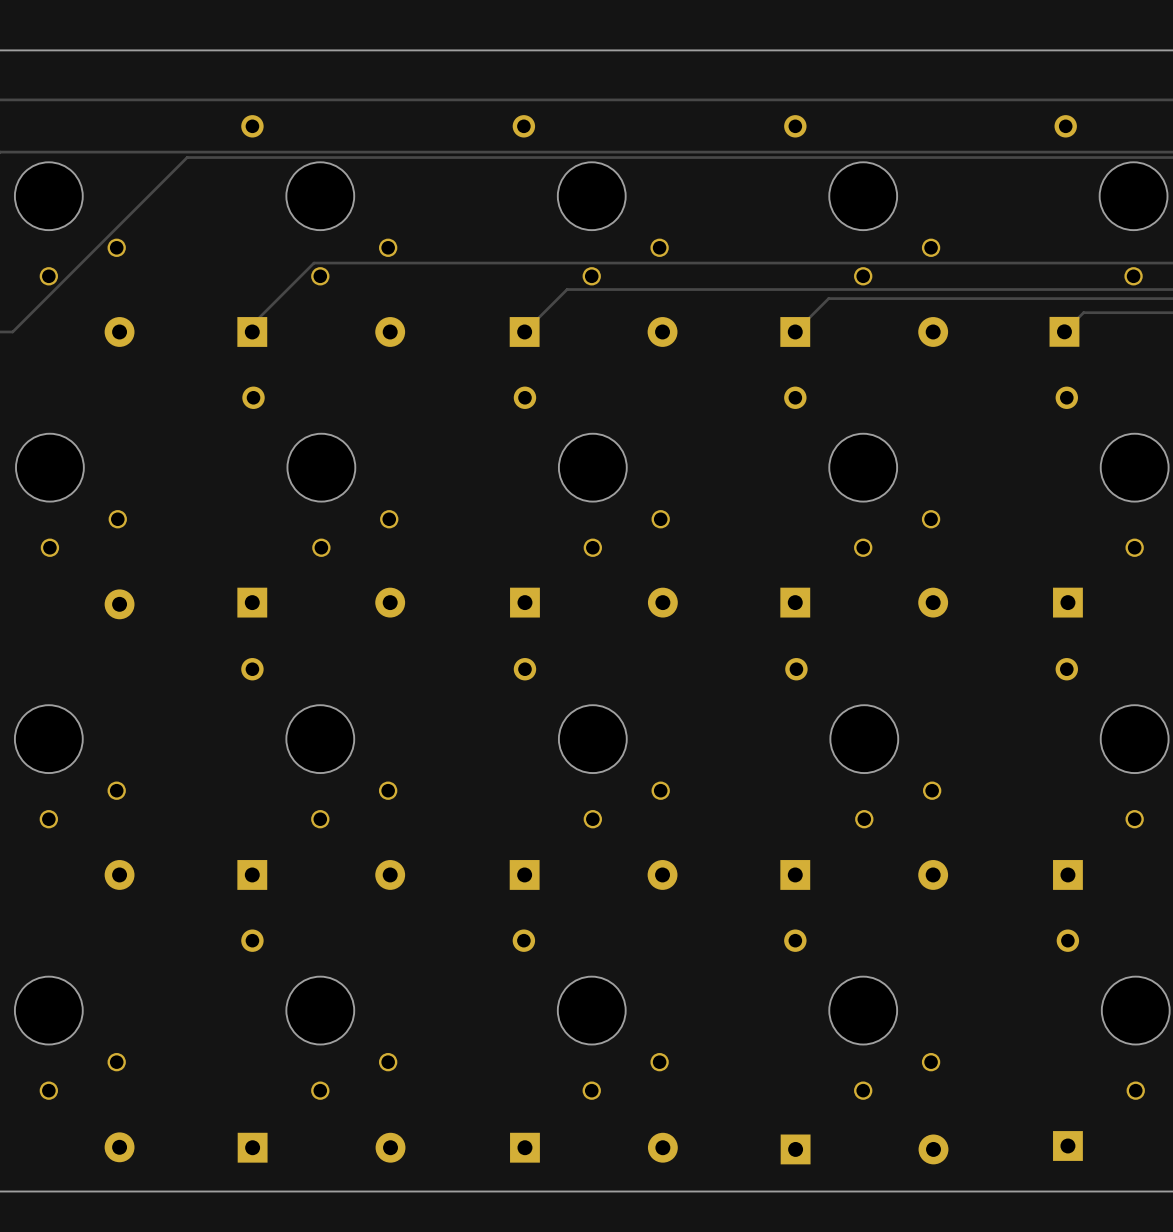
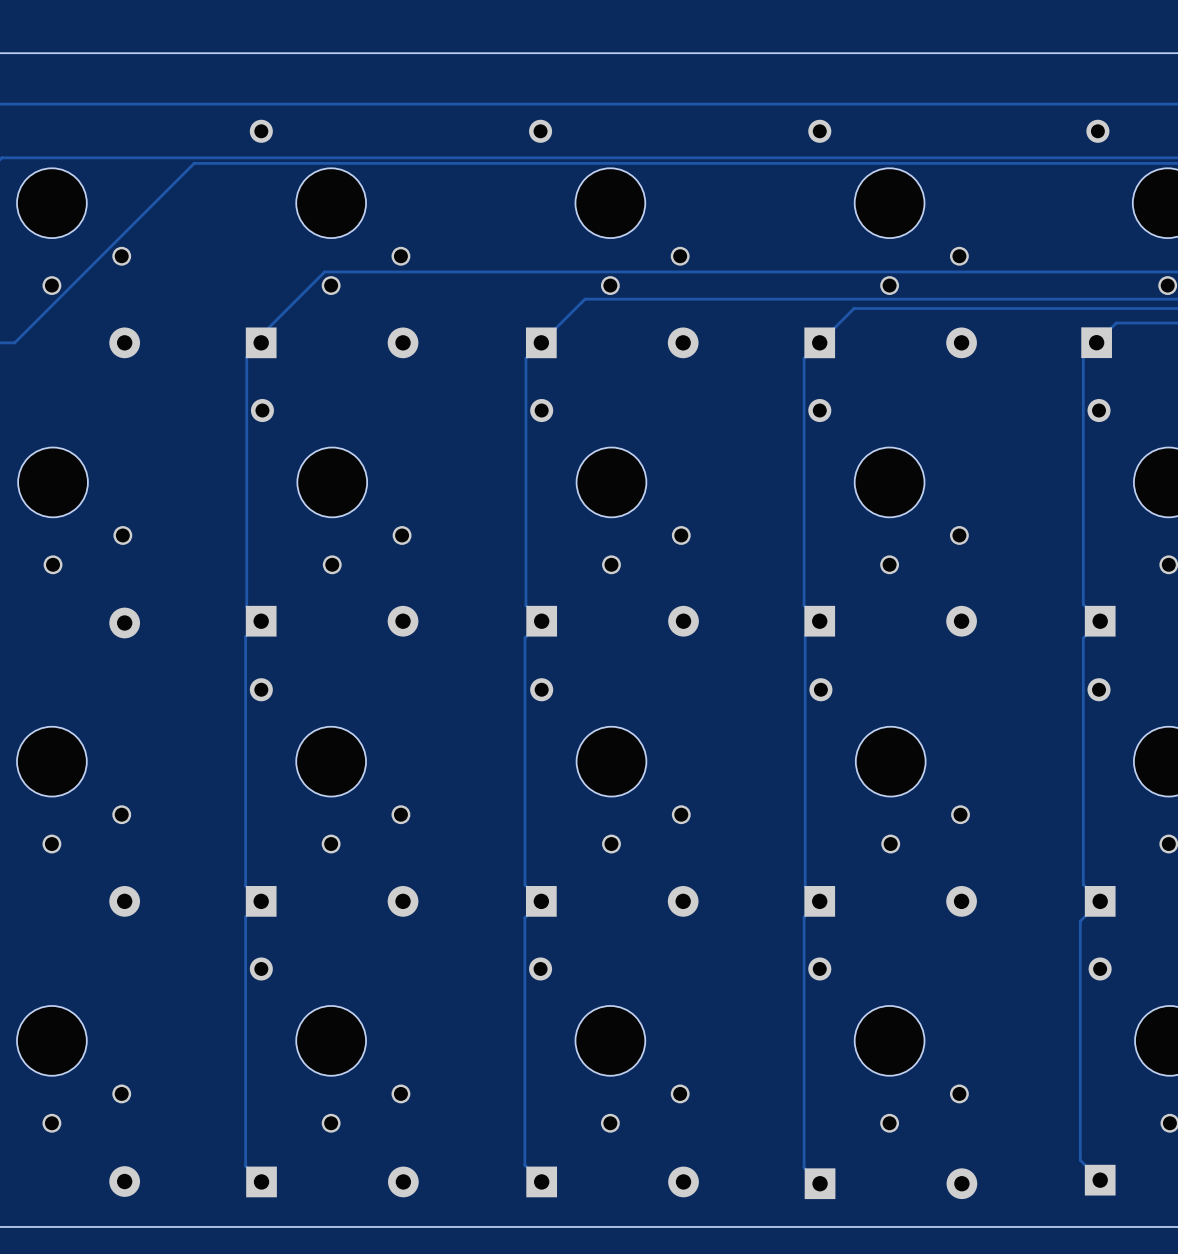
track: none -> (261, 342) (246, 357) (246, 606) (261, 621) (245, 636) (245, 885) (261, 901) (245, 916) (245, 1166) (261, 1181)
track: none -> (541, 342) (525, 358) (525, 605) (541, 621) (524, 637) (524, 885) (541, 901) (524, 917) (524, 1165) (541, 1181)
track: none -> (819, 342) (804, 358) (804, 605) (819, 621) (805, 635) (805, 886) (819, 901) (804, 917) (804, 1167) (820, 1183)
track: none -> (1096, 342) (1083, 356) (1083, 604) (1100, 621) (1083, 638) (1083, 884) (1100, 901) (1080, 921) (1080, 1160) (1100, 1180)

